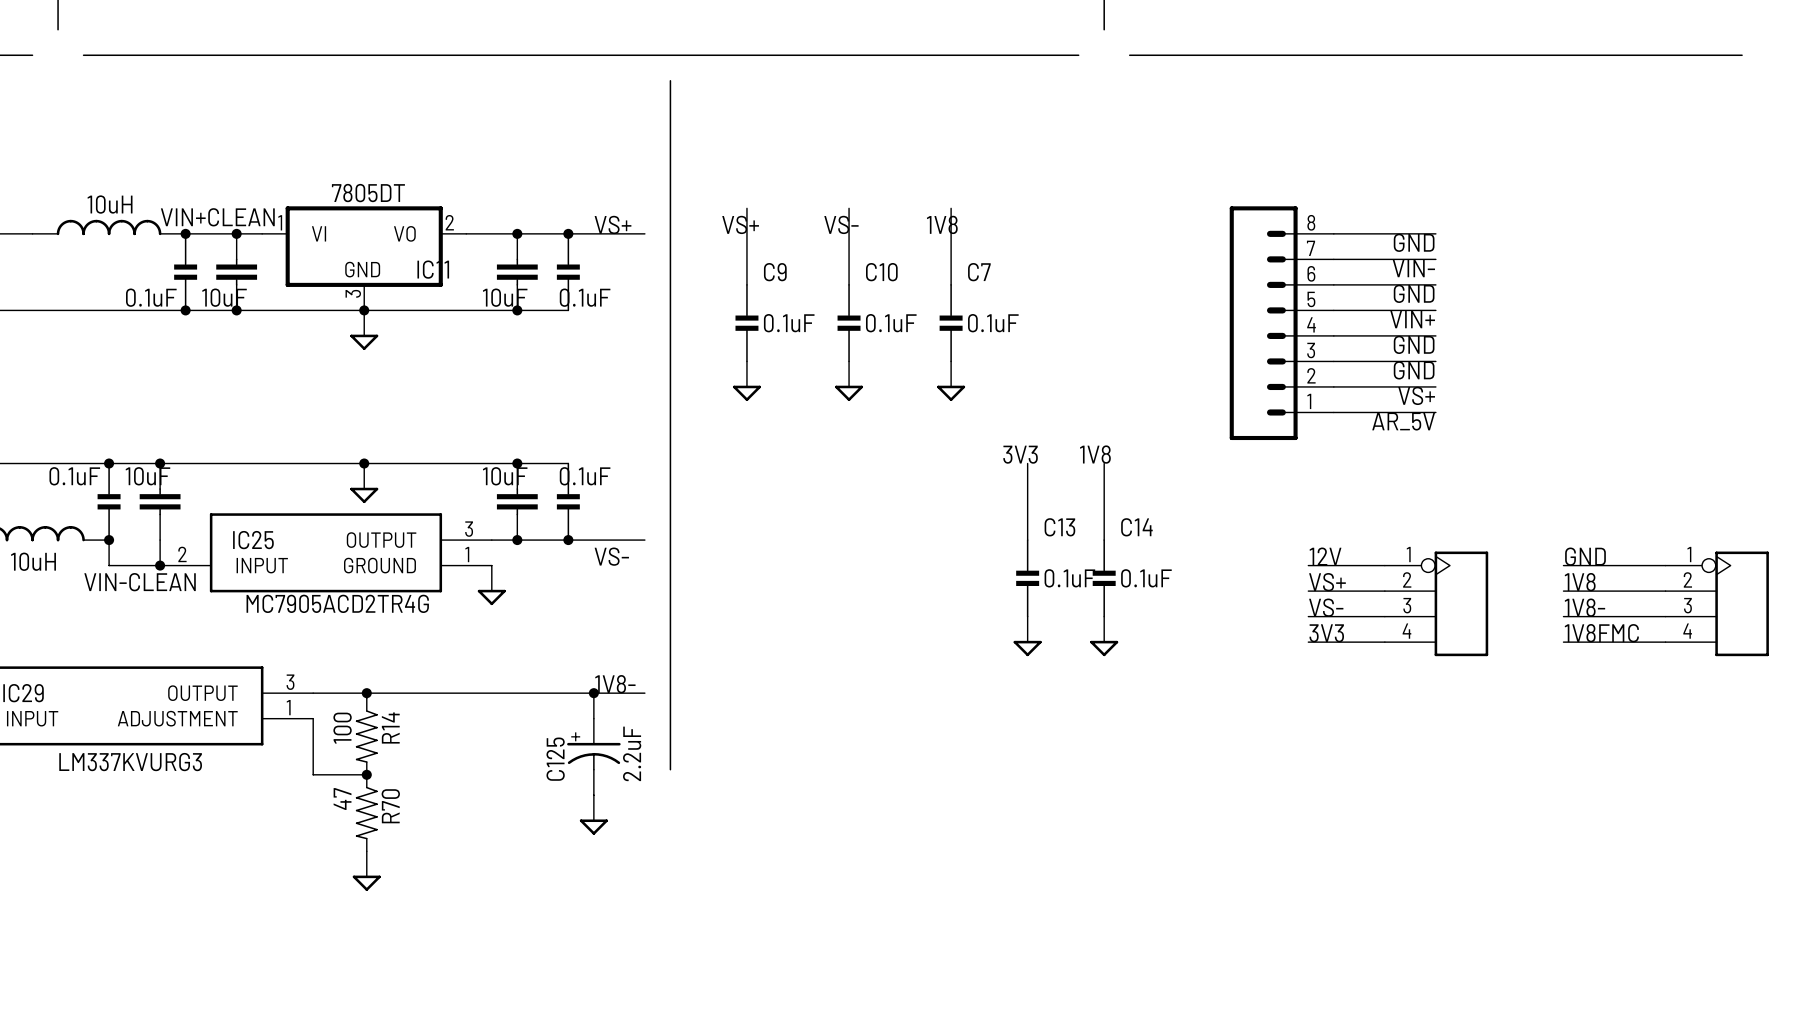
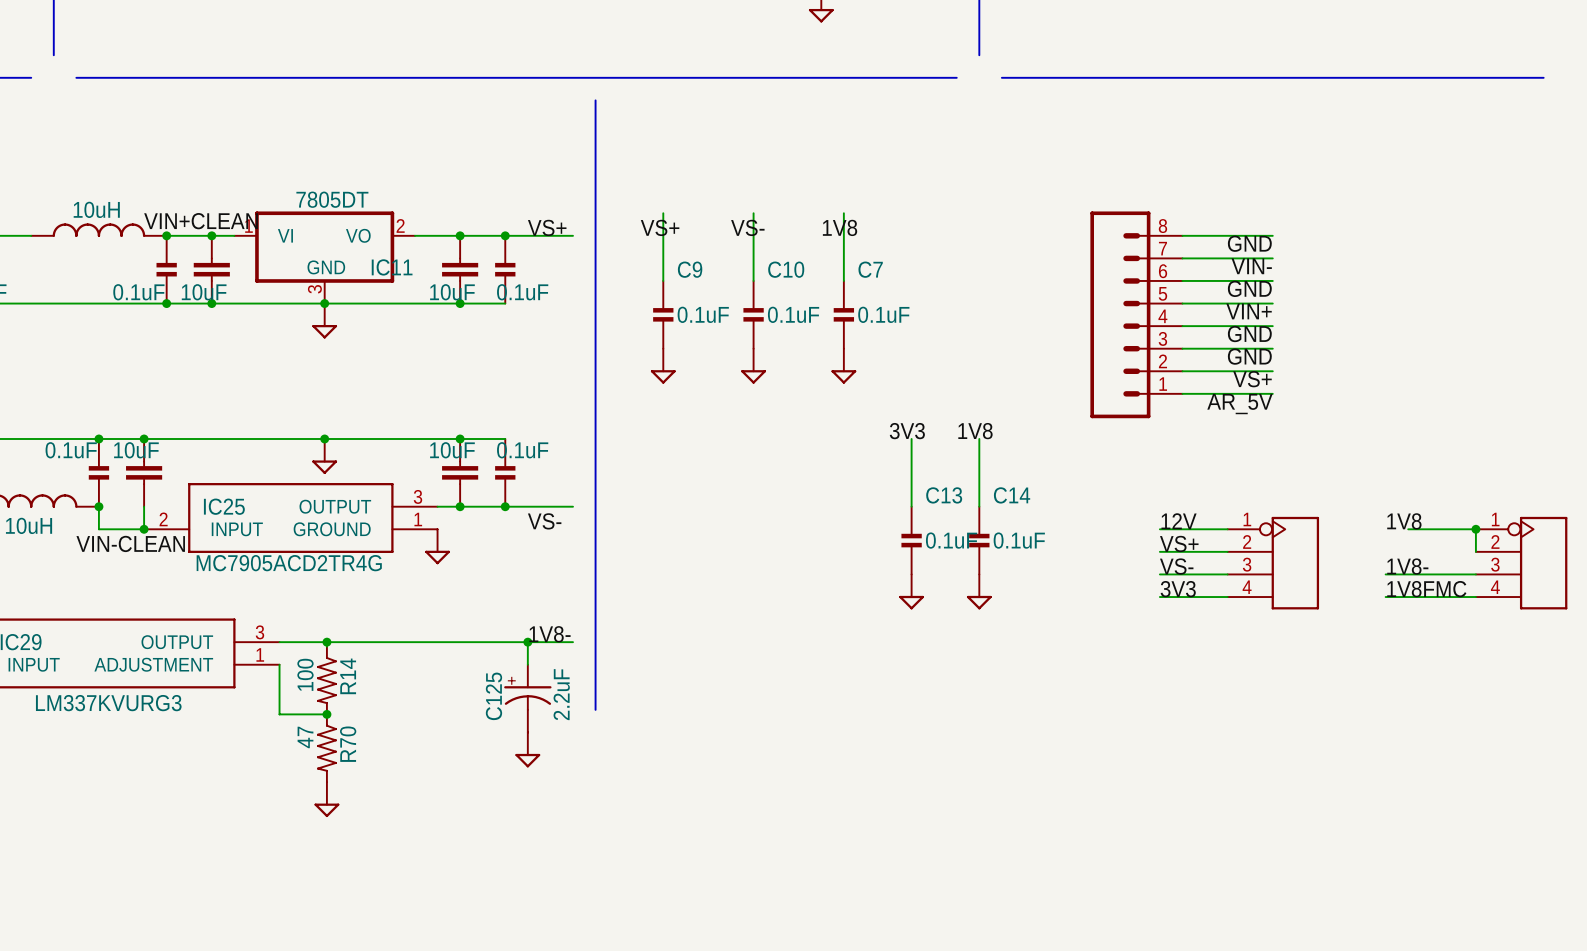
label: GND (1585, 556) -> 1V8 (1404, 521)
wire: (1563, 565) (1588, 565) -> none
junction: none -> (1475, 529)
label: 1V8 (1580, 582) -> none
wire: (1563, 591) (1665, 591) -> (1475, 529) (1475, 551)

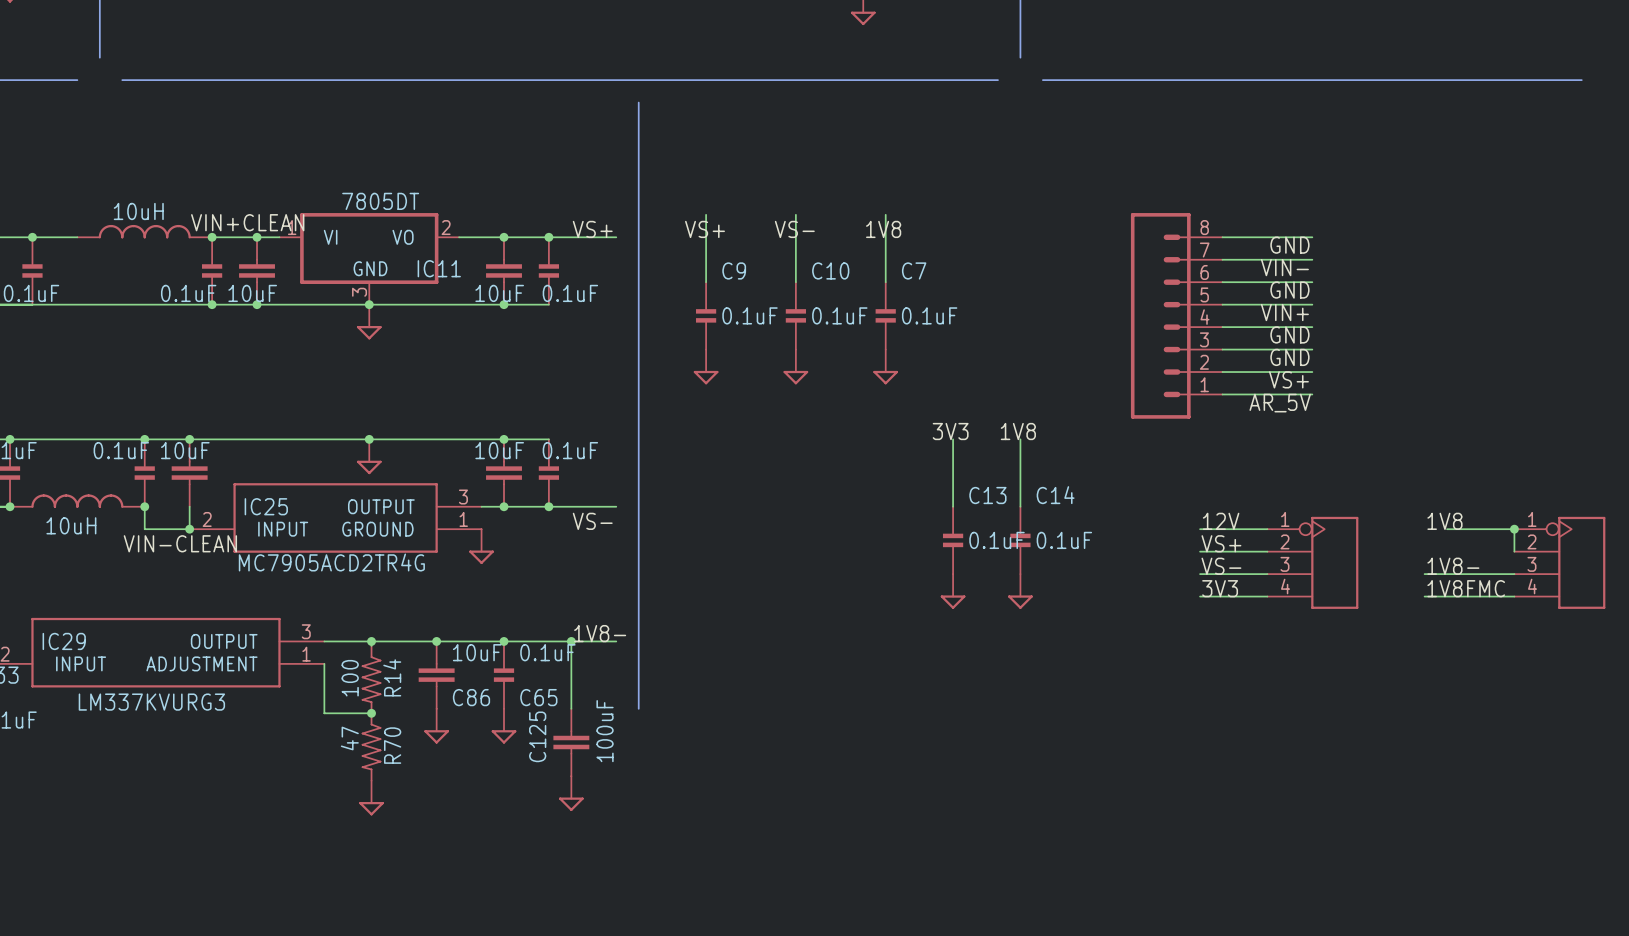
junction: none -> (436, 641)
junction: none -> (504, 641)
C125 symbol: [504, 664, 552, 733] -> [553, 708, 590, 777]
C86: none -> 10uF (436, 675)
C65: none -> 0.1uF (504, 675)
C125 value: 2.2uF (561, 694) -> 100uF (605, 731)
power symbol: none -> (436, 726)
power symbol: none -> (504, 726)
power symbol: (527, 749) -> none
power symbol: none -> (571, 793)

